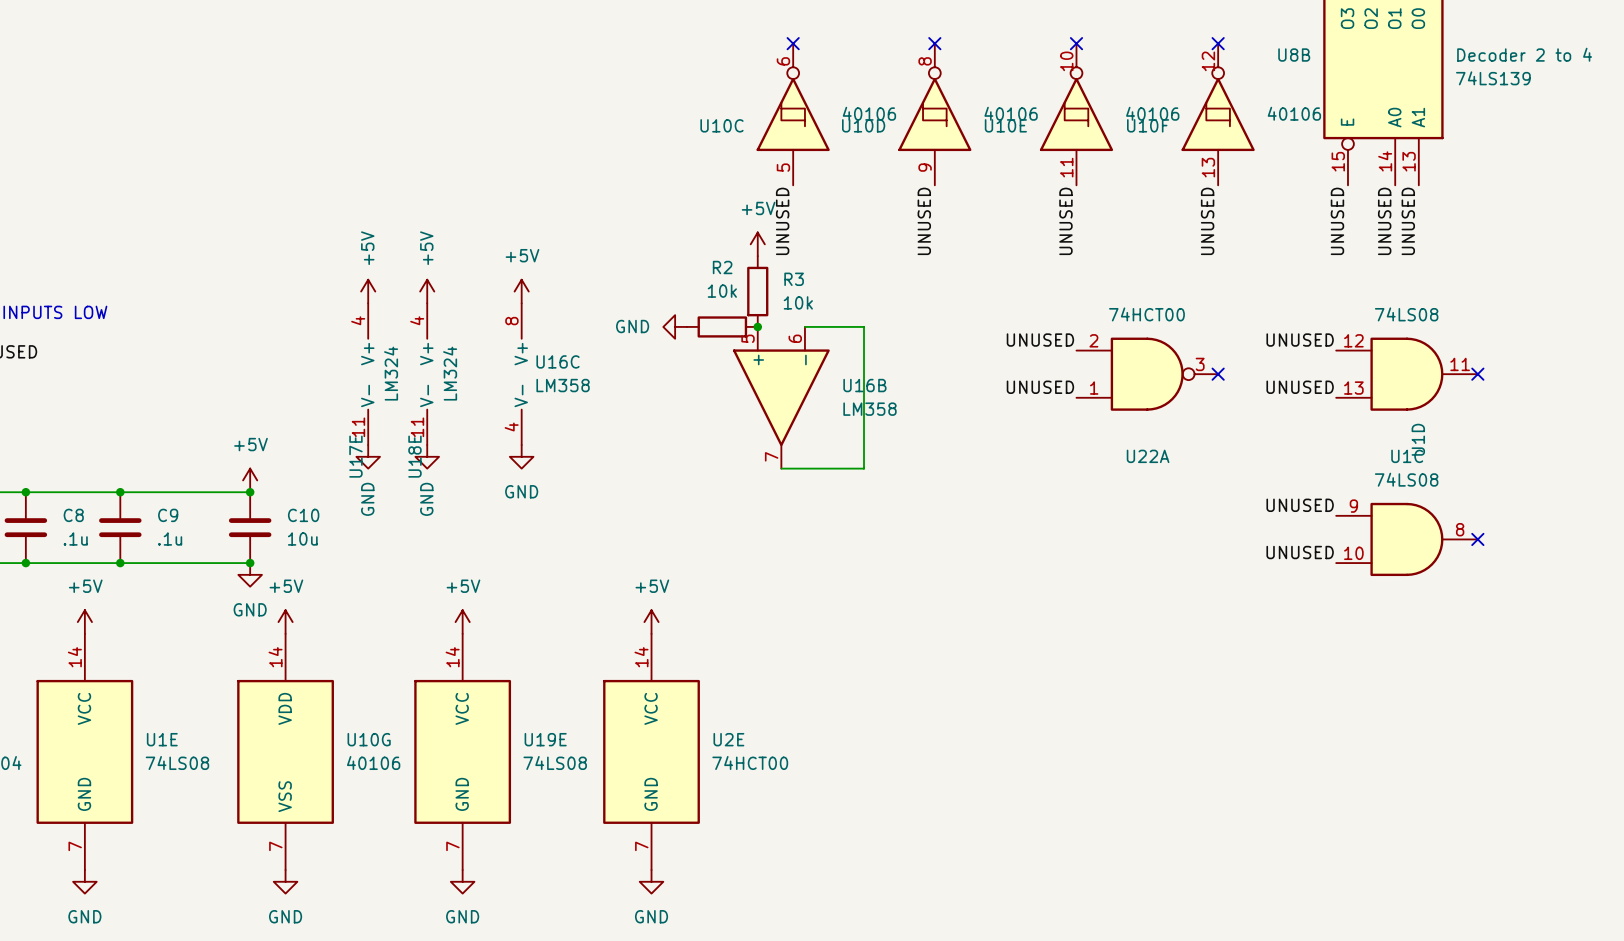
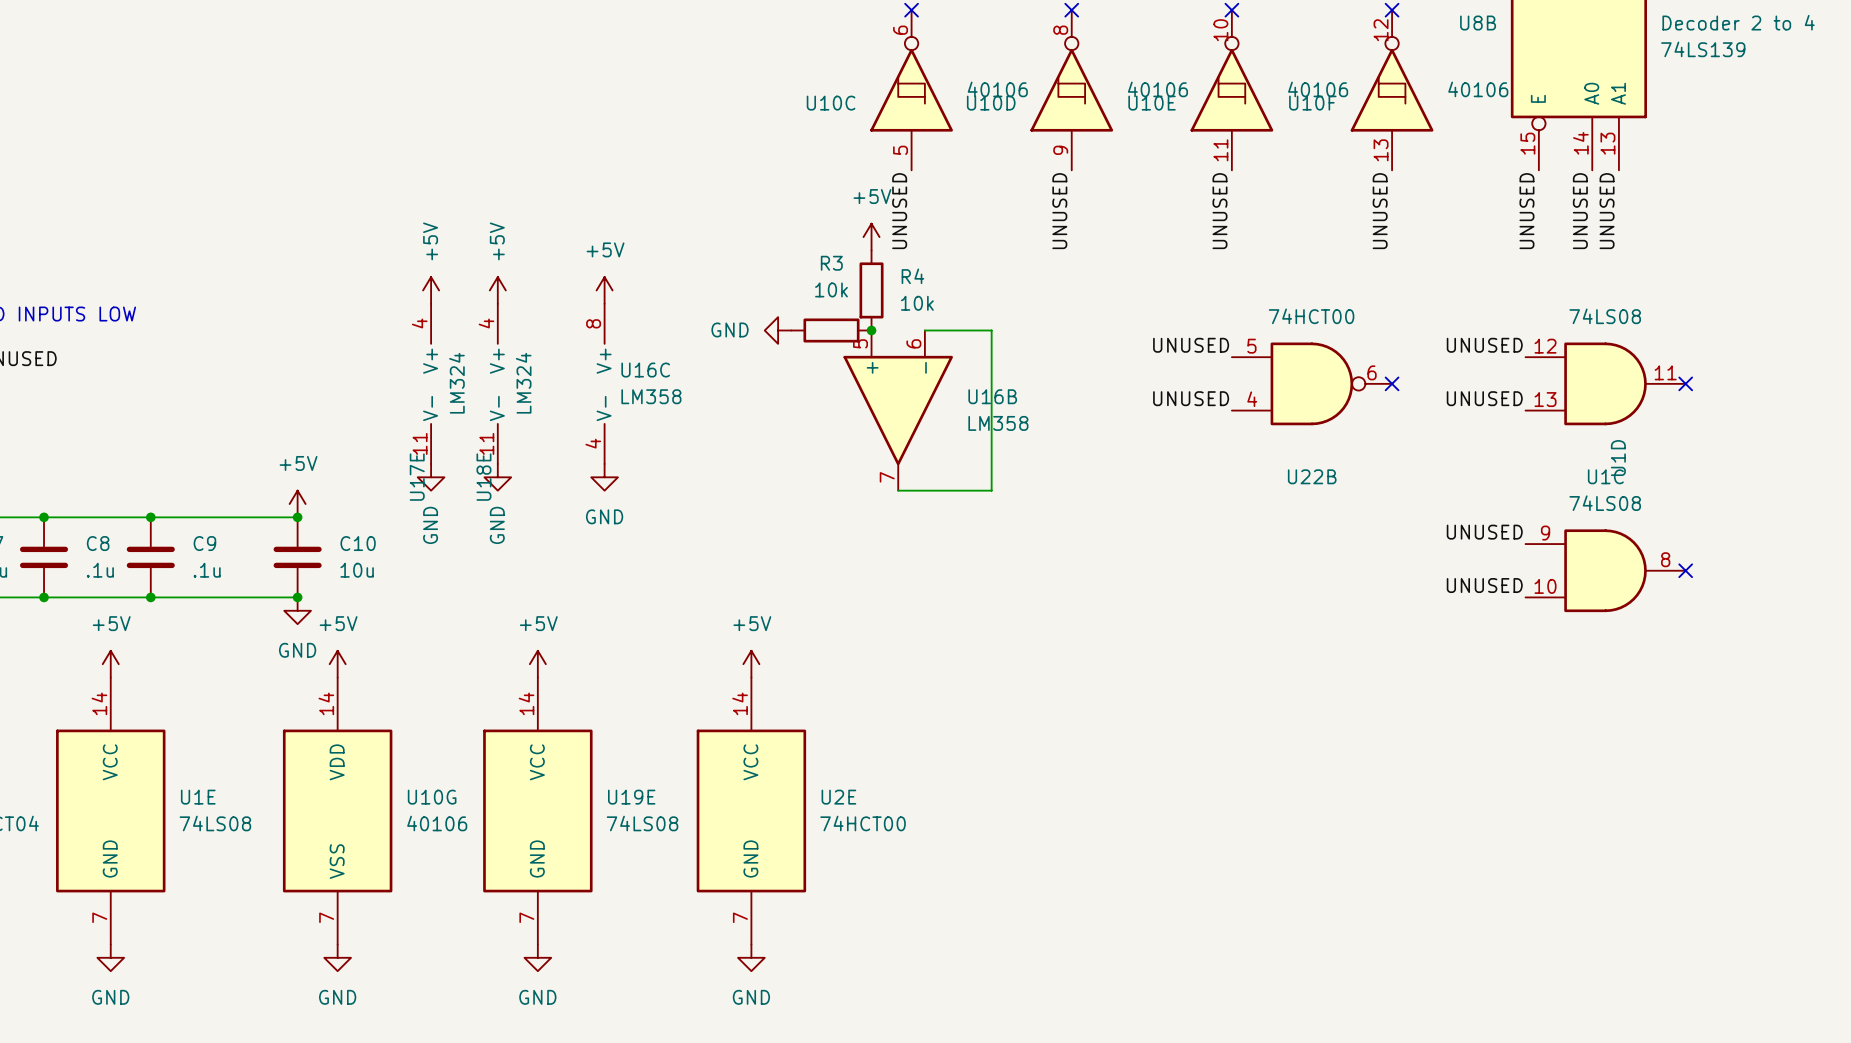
R2 name: R2 (722, 267) -> R3 (831, 263)
R3 name: R3 (794, 279) -> R4 (912, 276)
U22A pin number: 2 (1093, 340) -> 5 (1251, 346)
U22A pin number: 3 (1200, 364) -> 6 (1372, 372)
U22A pin number: 1 (1094, 388) -> 4 (1252, 399)
U22A name: U22A (1148, 456) -> U22B (1312, 476)

